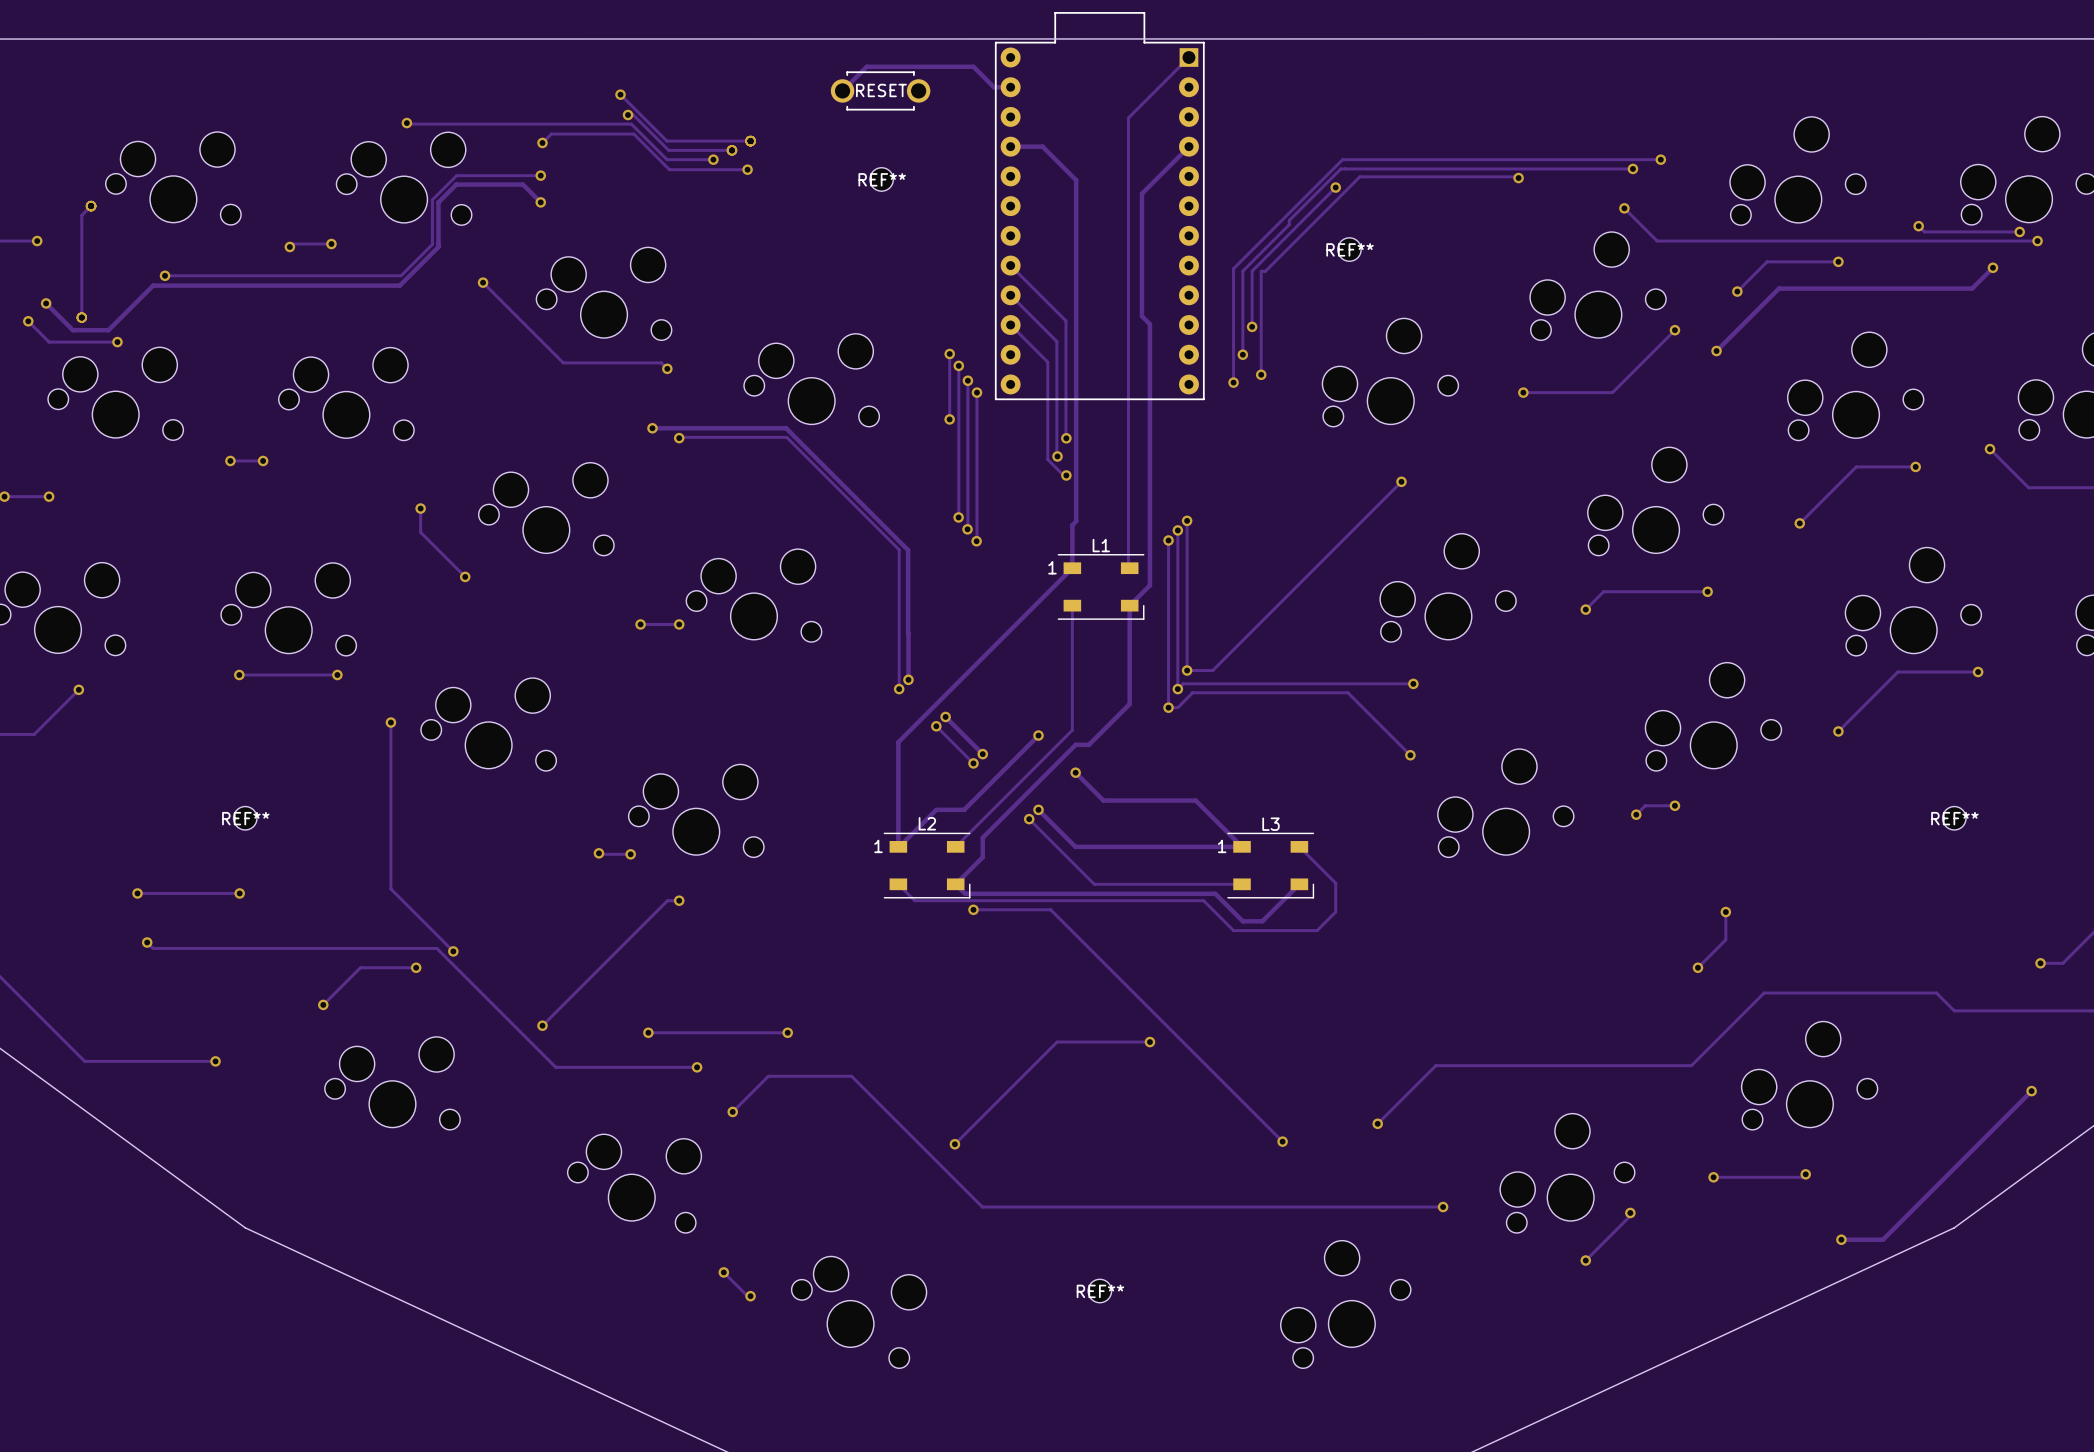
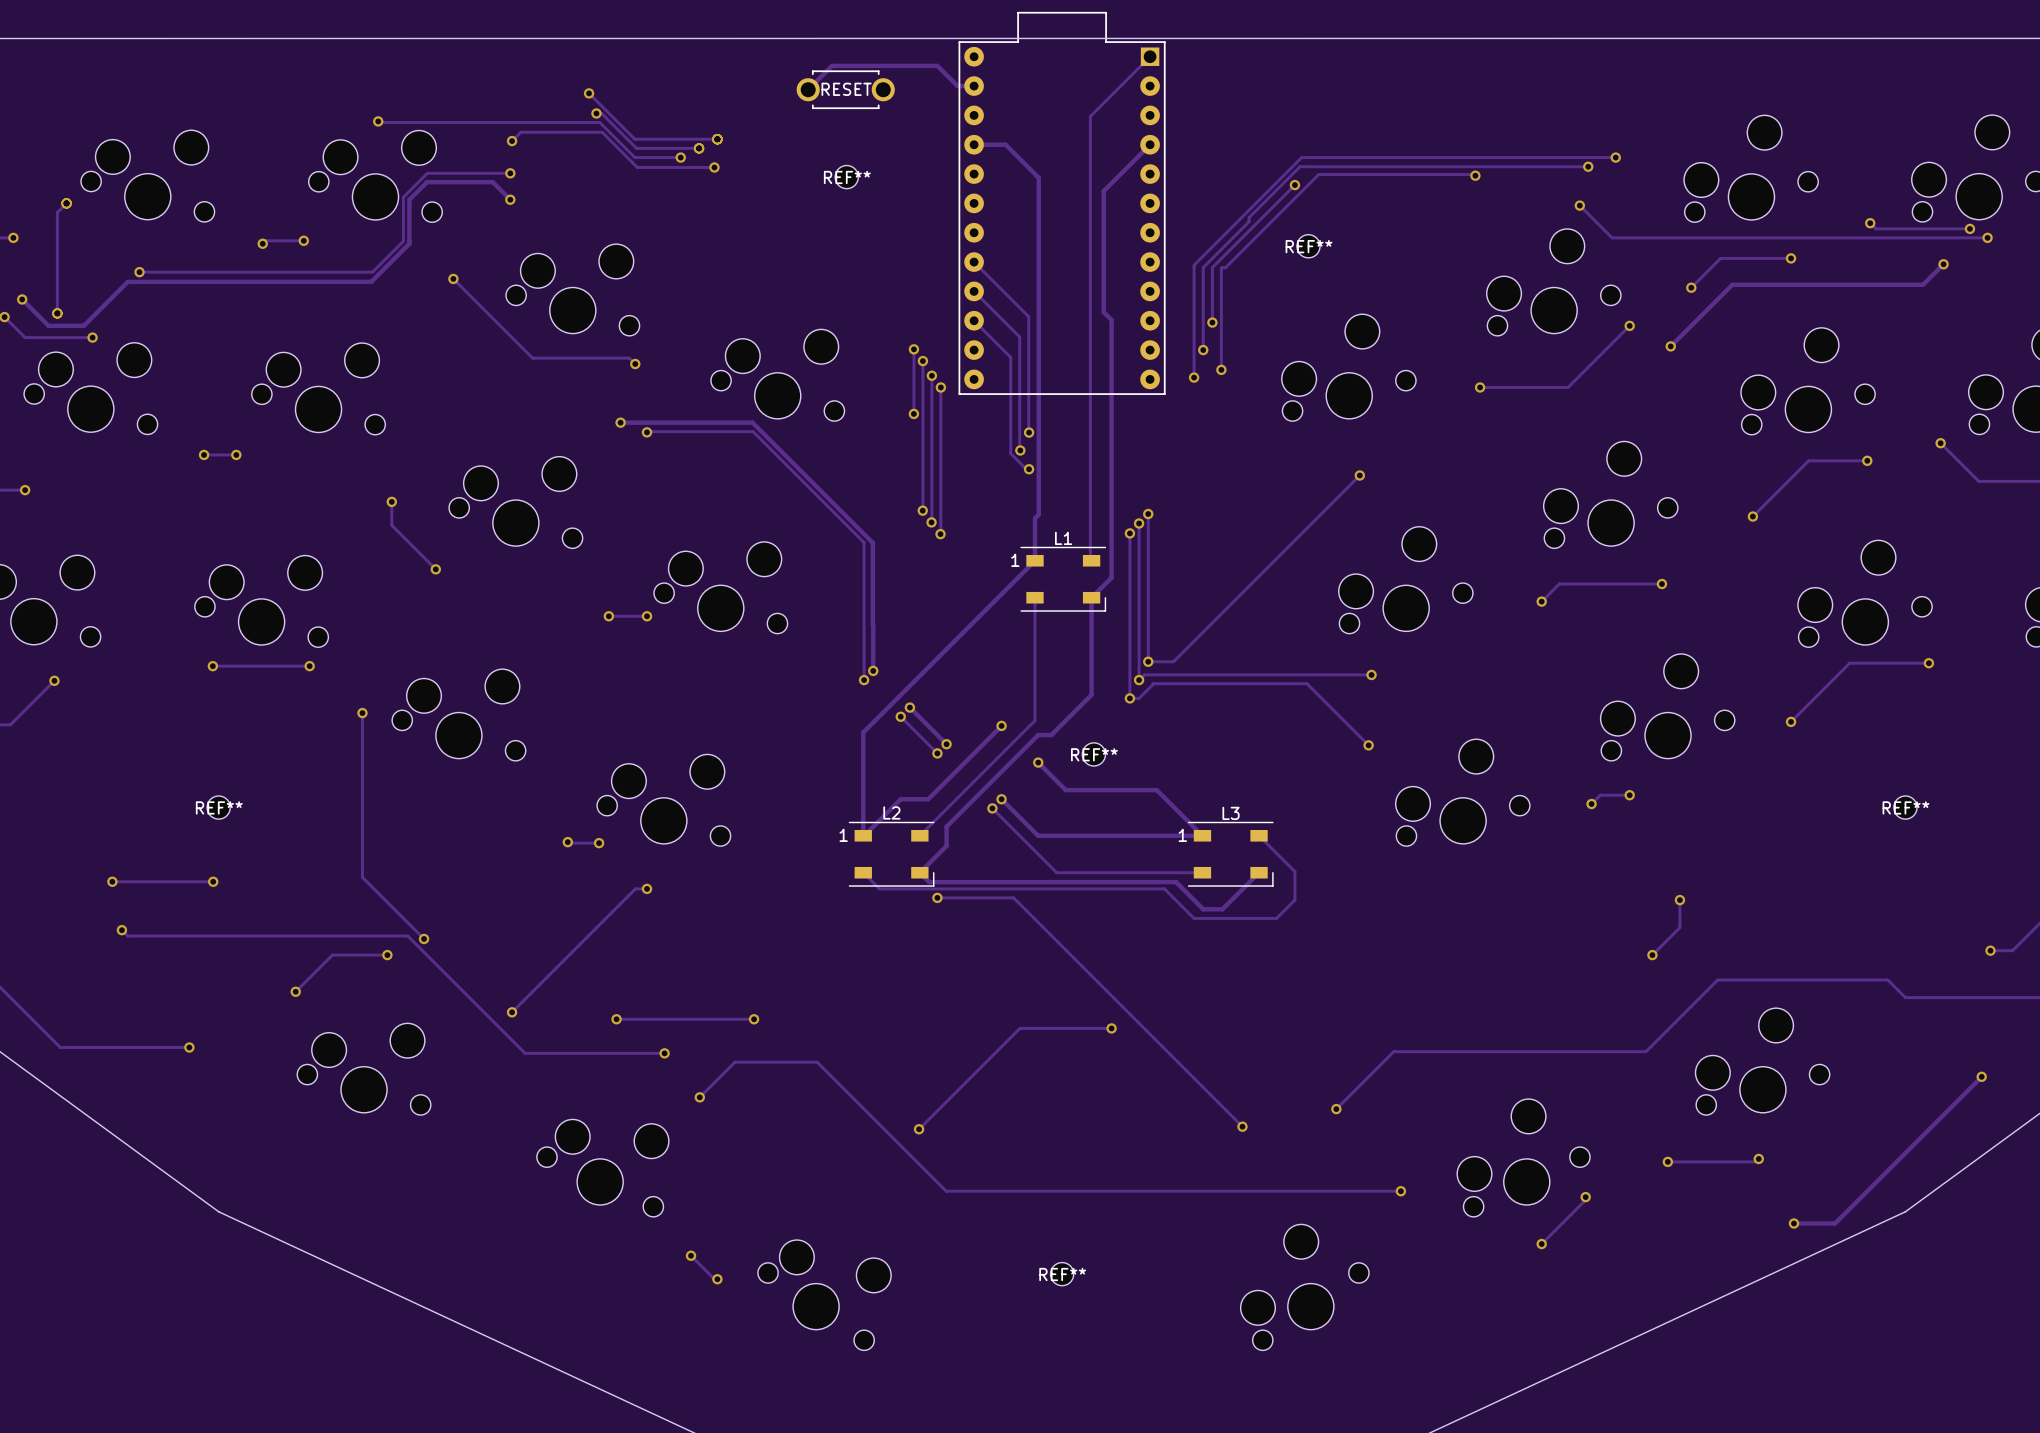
REF**: none -> (1093, 754)

